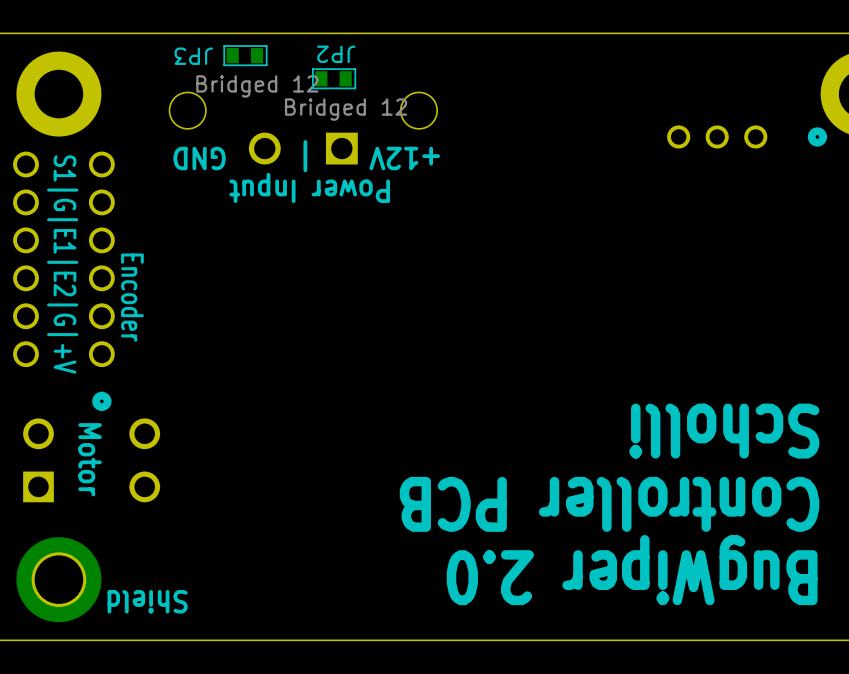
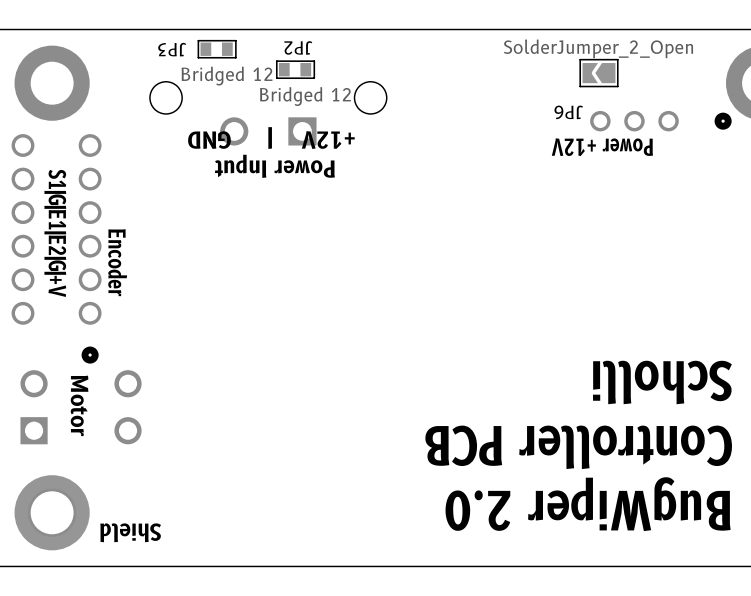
JP6: none -> SolderJumper_2_Open (599, 73)
text: none -> Power +12V (602, 147)

